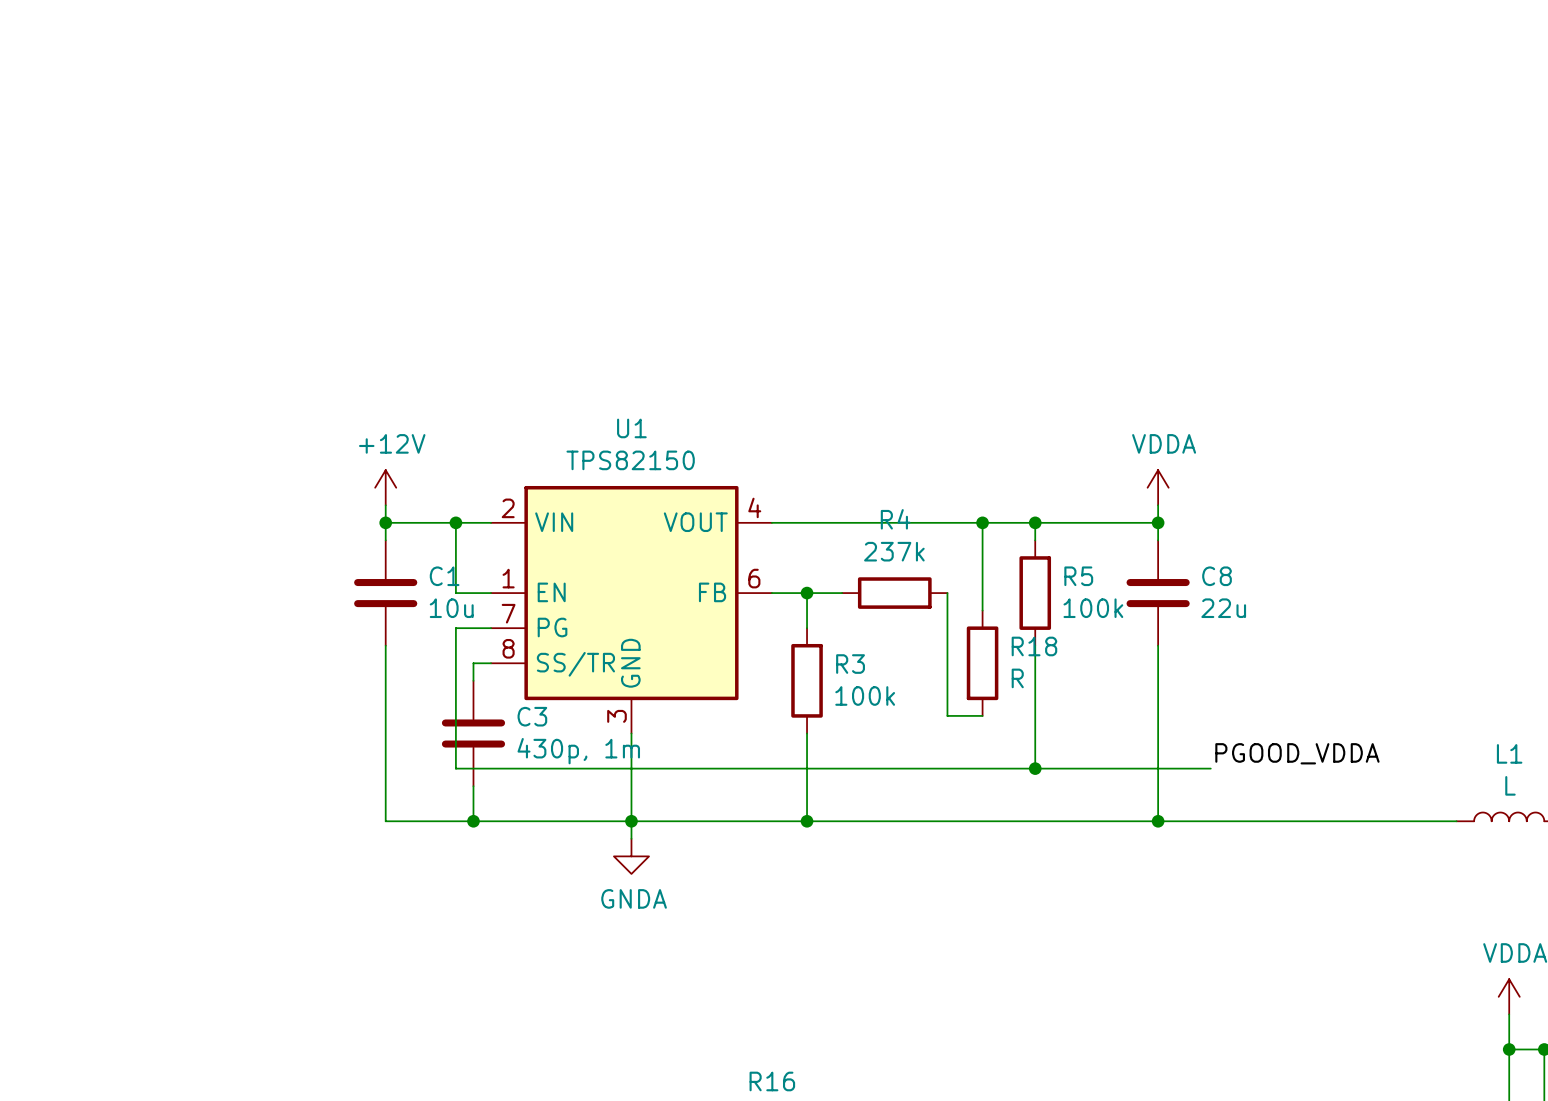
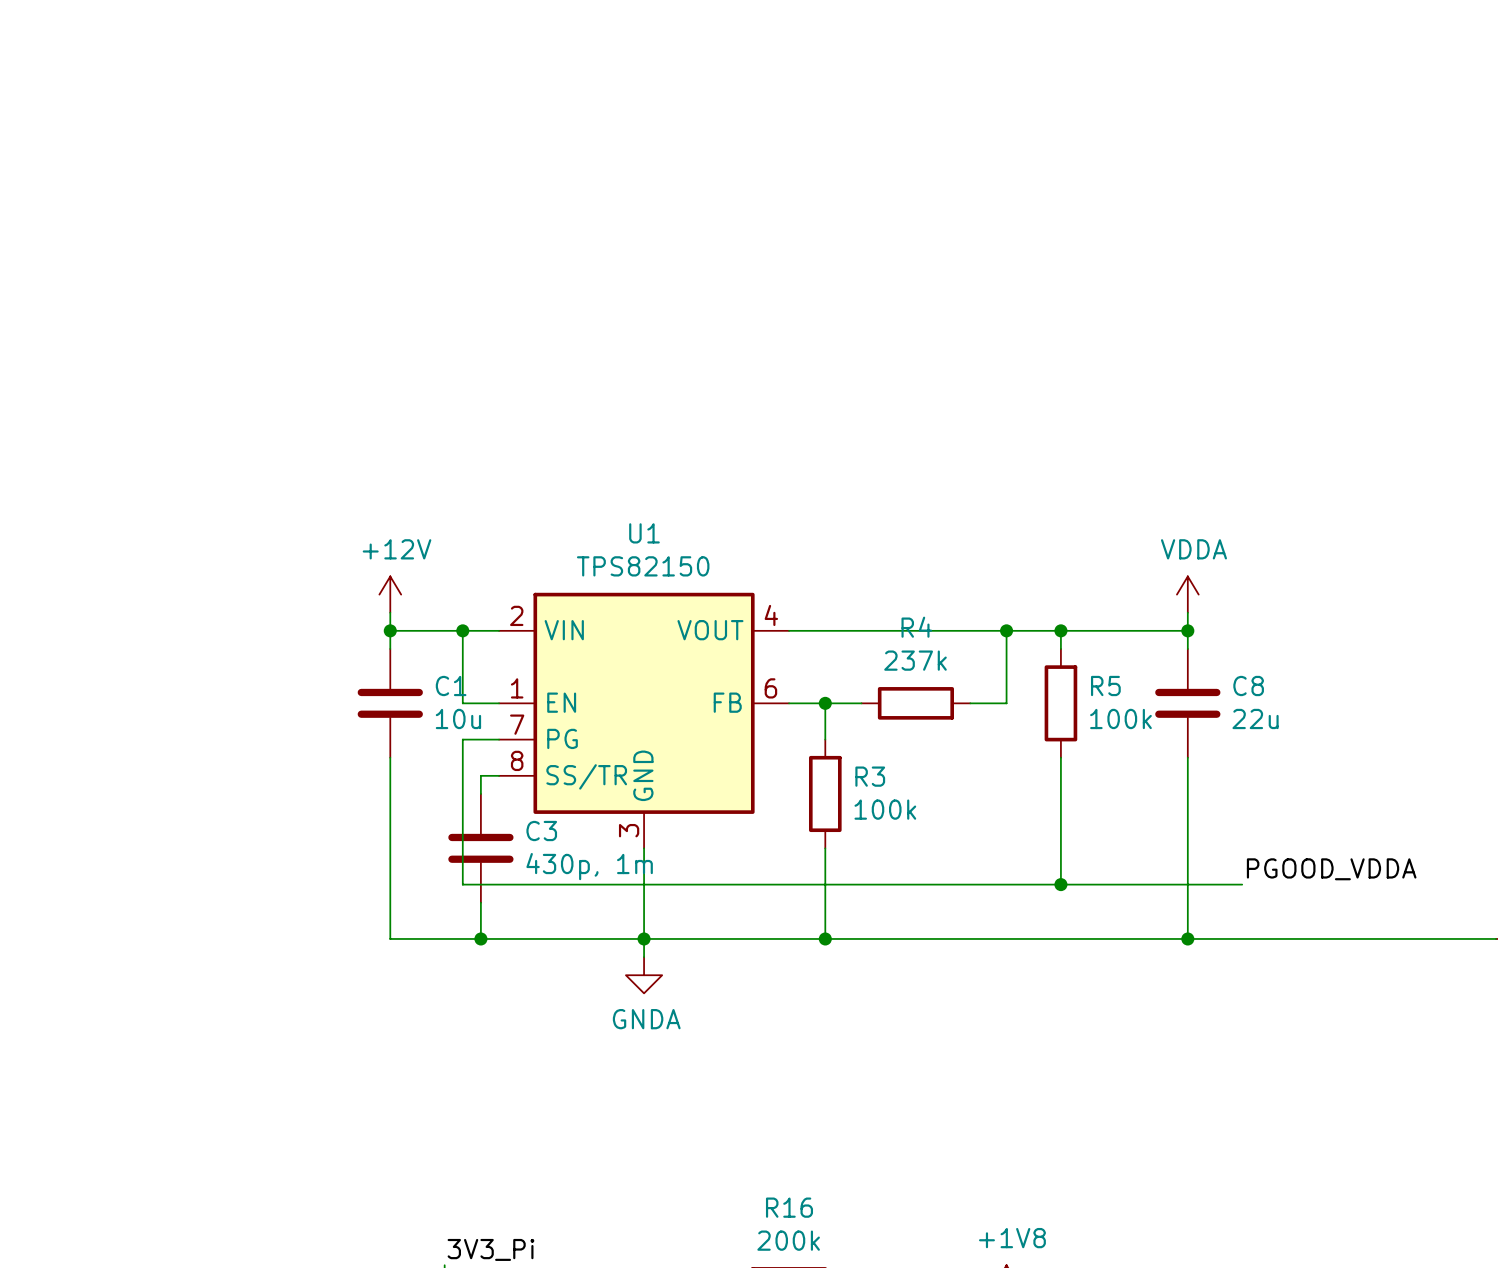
wire: (947, 593) (947, 715) (982, 715) -> none
wire: (982, 593) (982, 610) -> (1006, 703) (970, 703)
R18: R (982, 663) -> none

